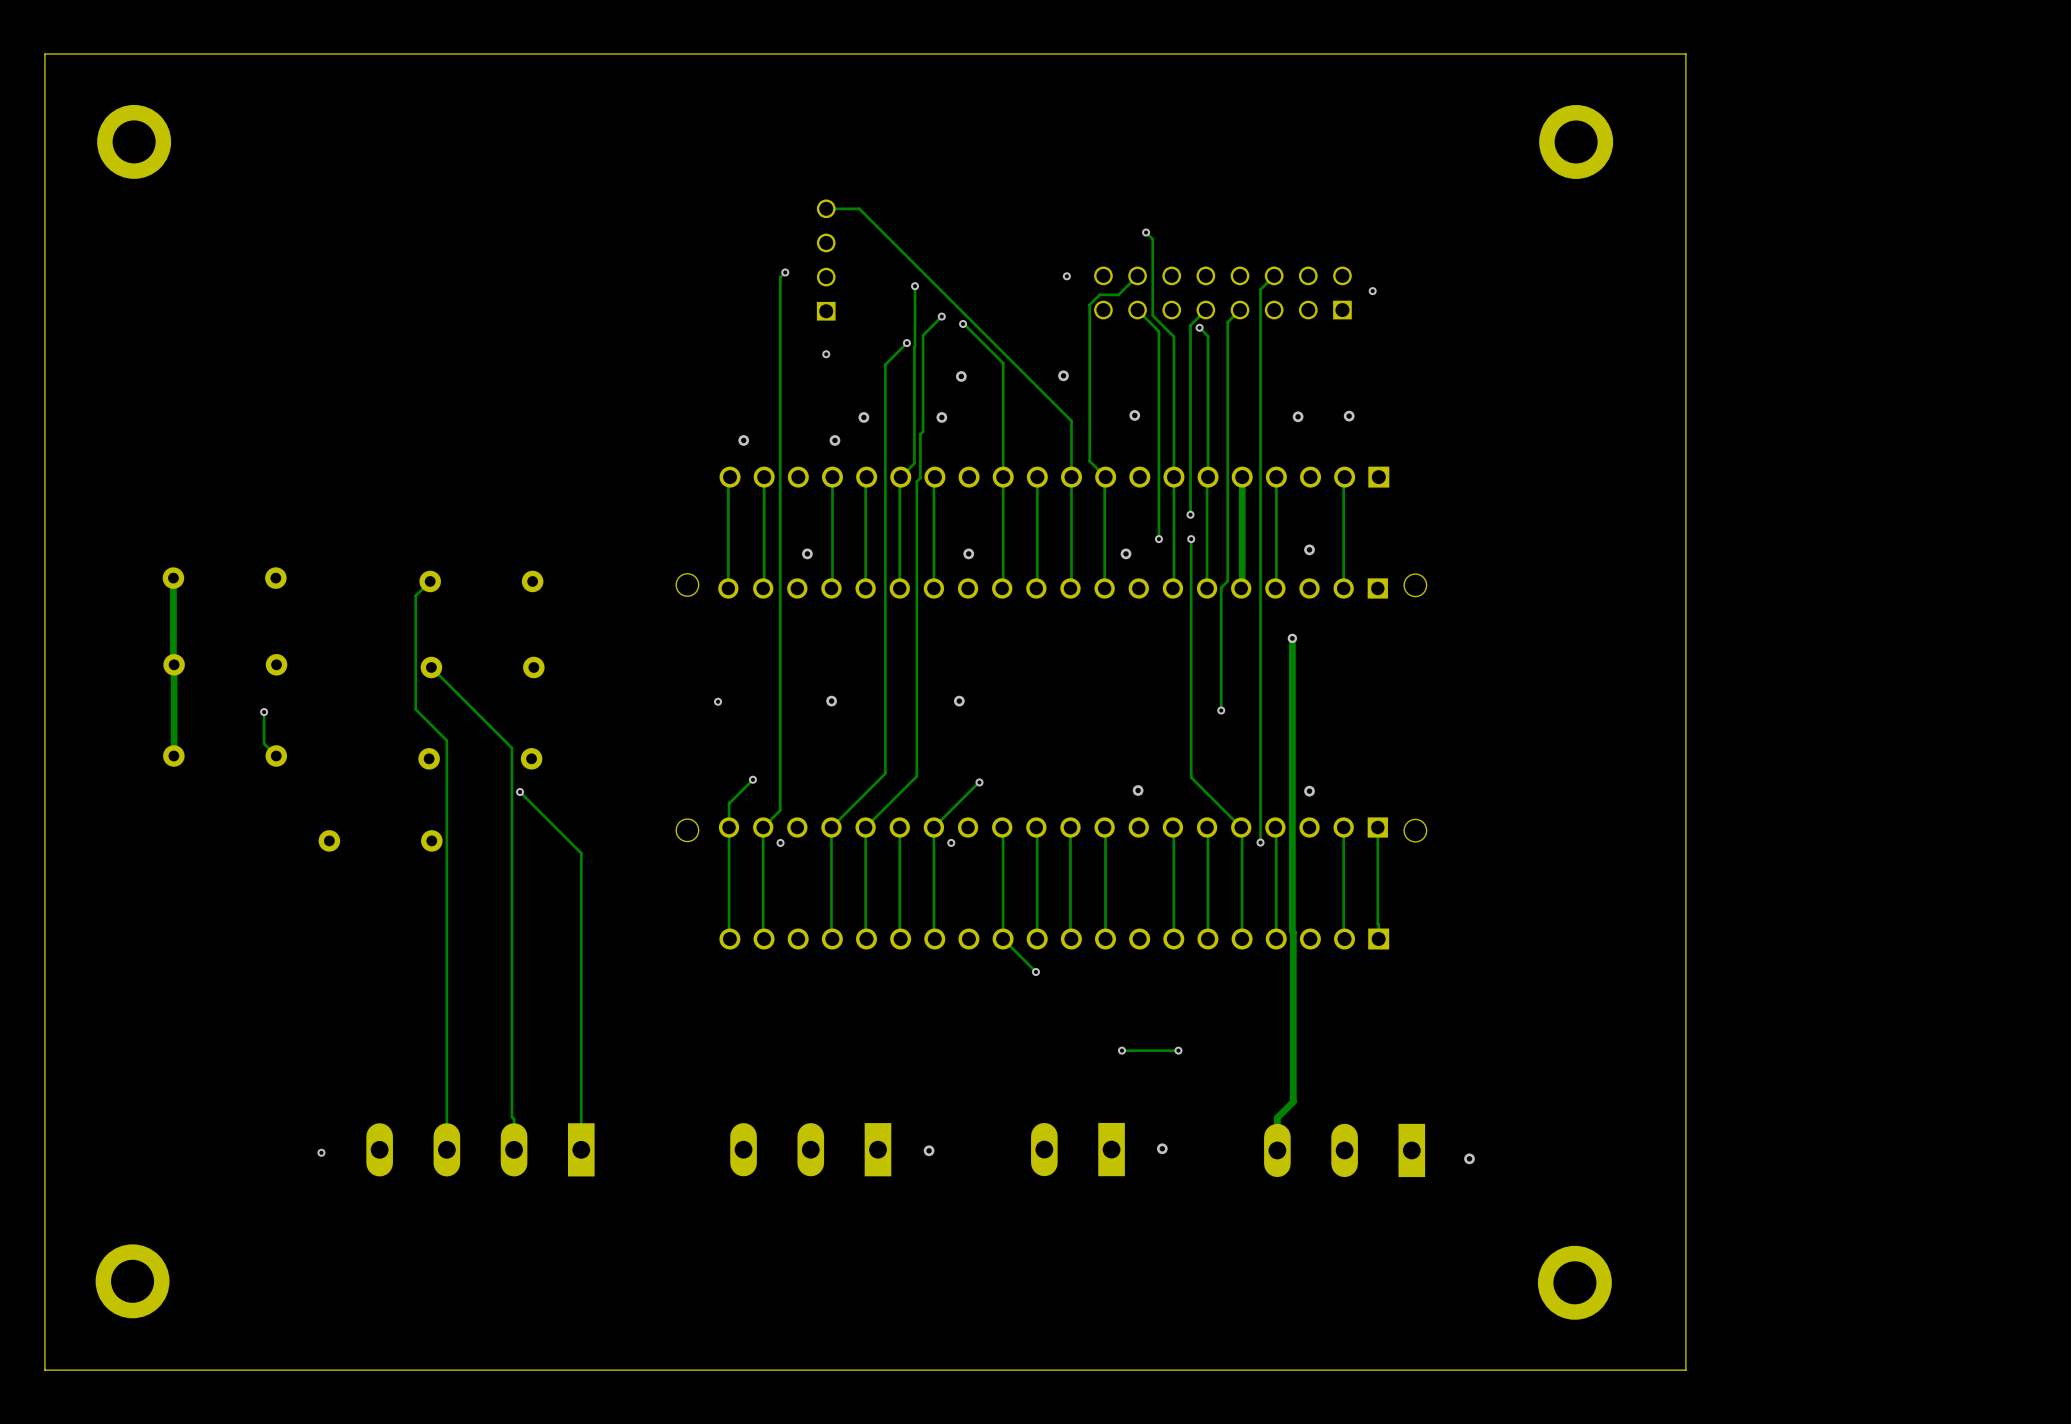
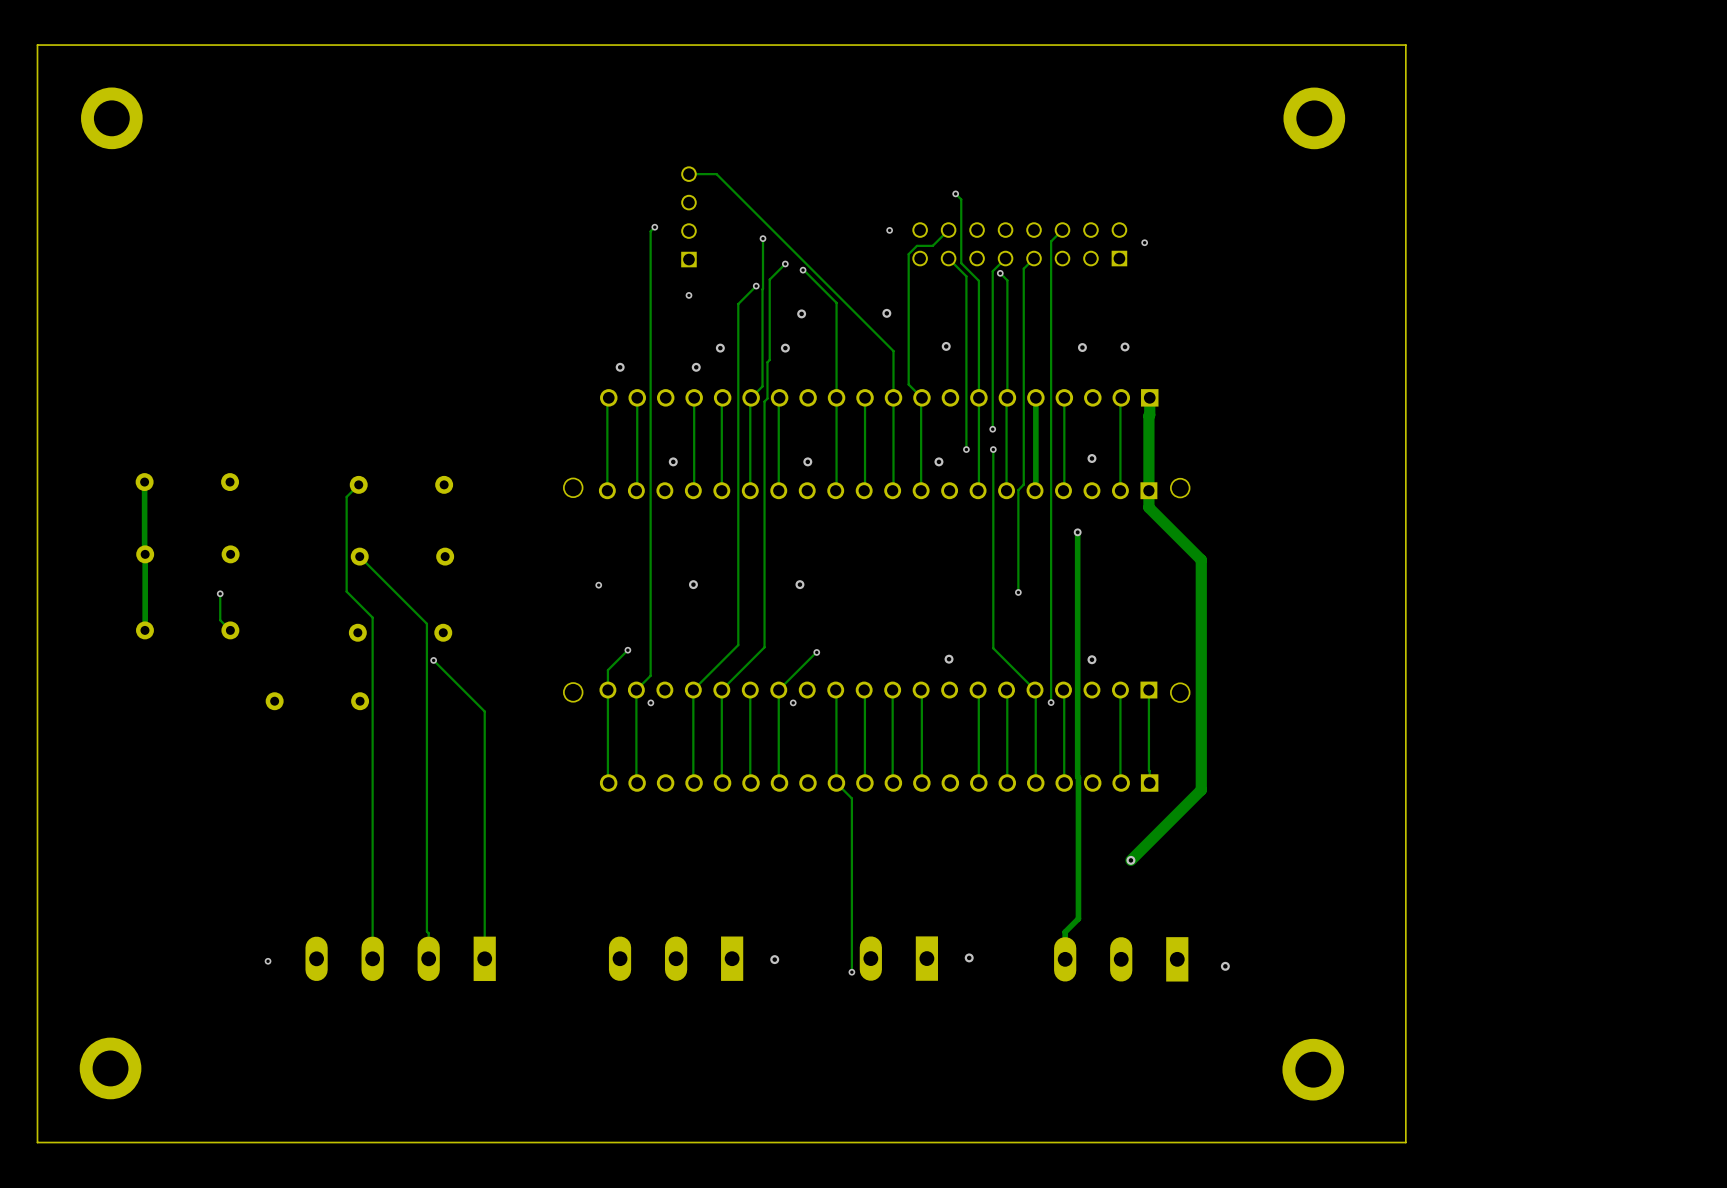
track: none -> (1149, 397) (1148, 507) (1201, 559) (1201, 790) (1130, 860)
track: (1021, 957) (1035, 971) -> (851, 798) (851, 972)
via: (1035, 971) -> none
via: none -> (1130, 860)
via: (1121, 1050) -> none
track: (1178, 1050) (1121, 1050) -> none
via: (1178, 1050) -> none
via: none -> (851, 972)

